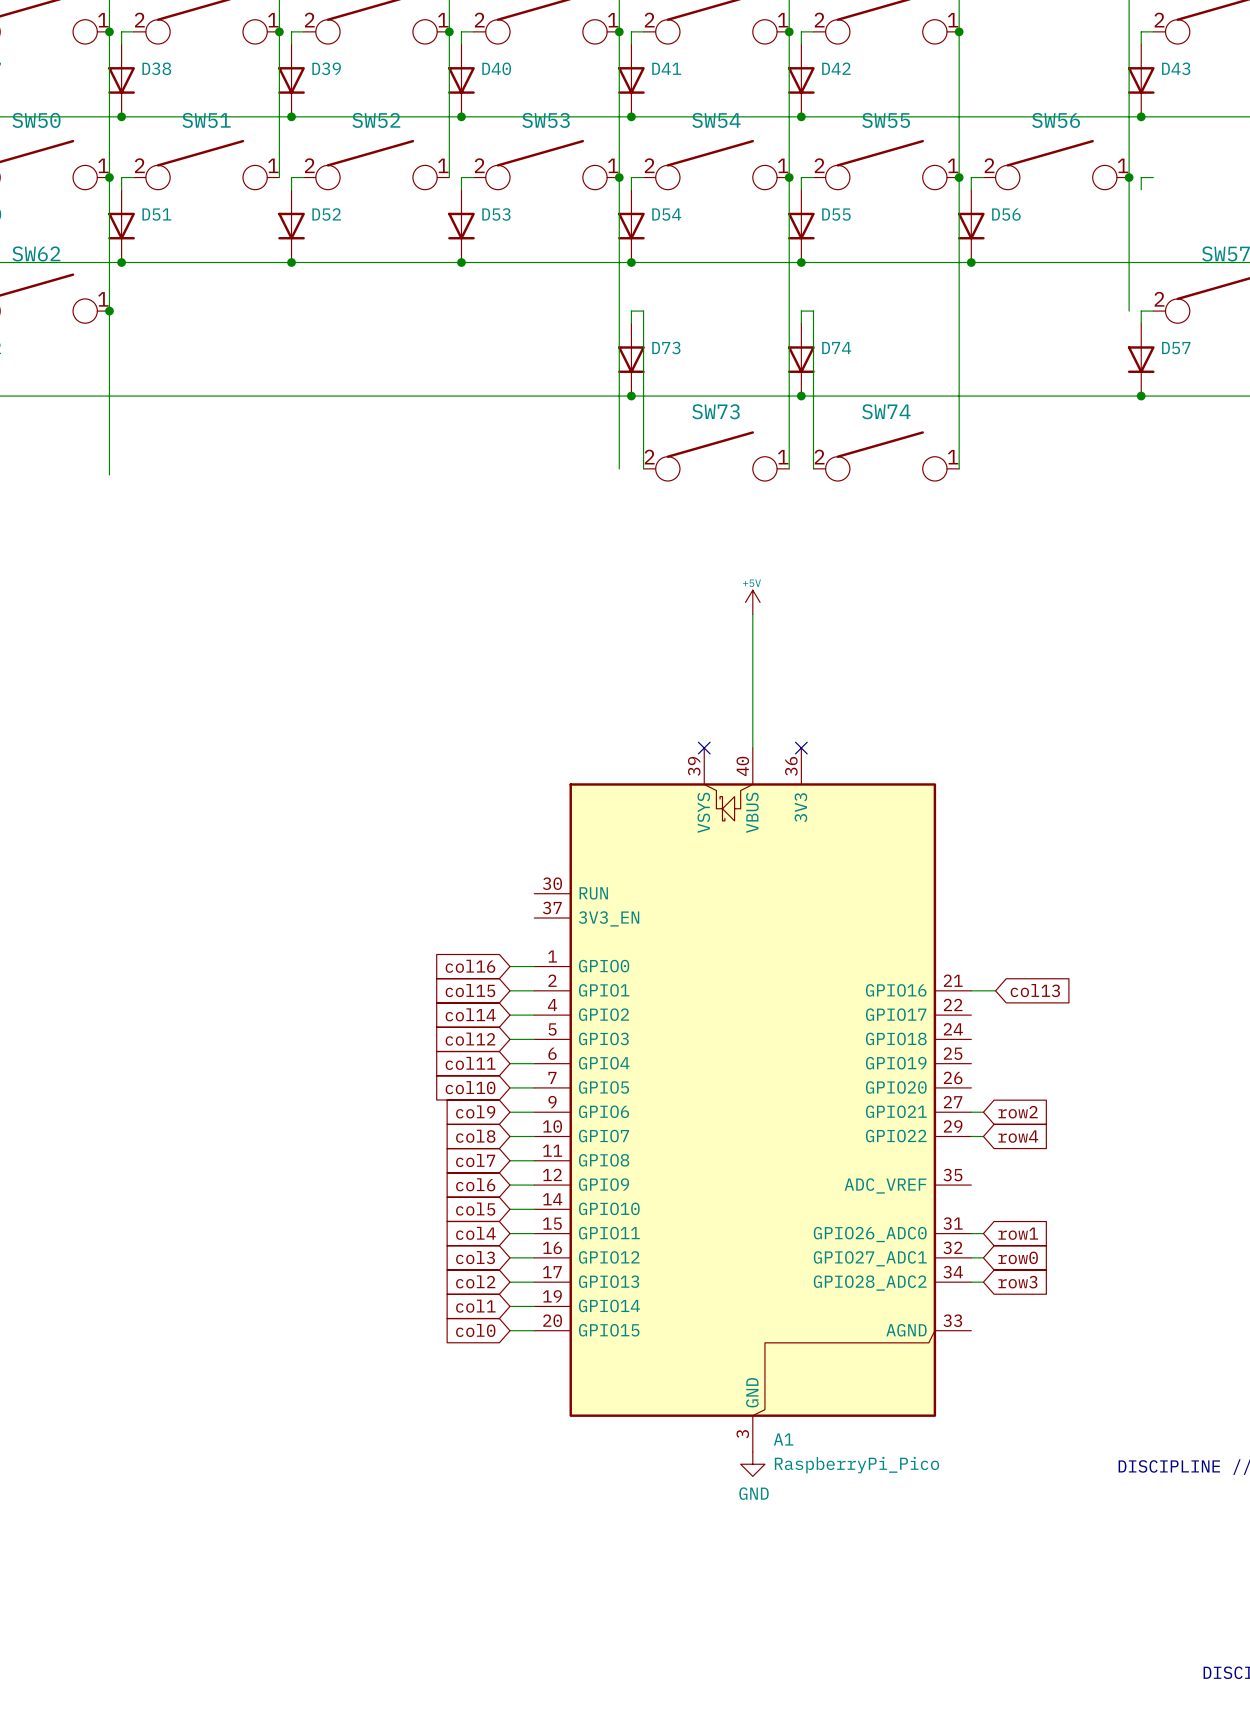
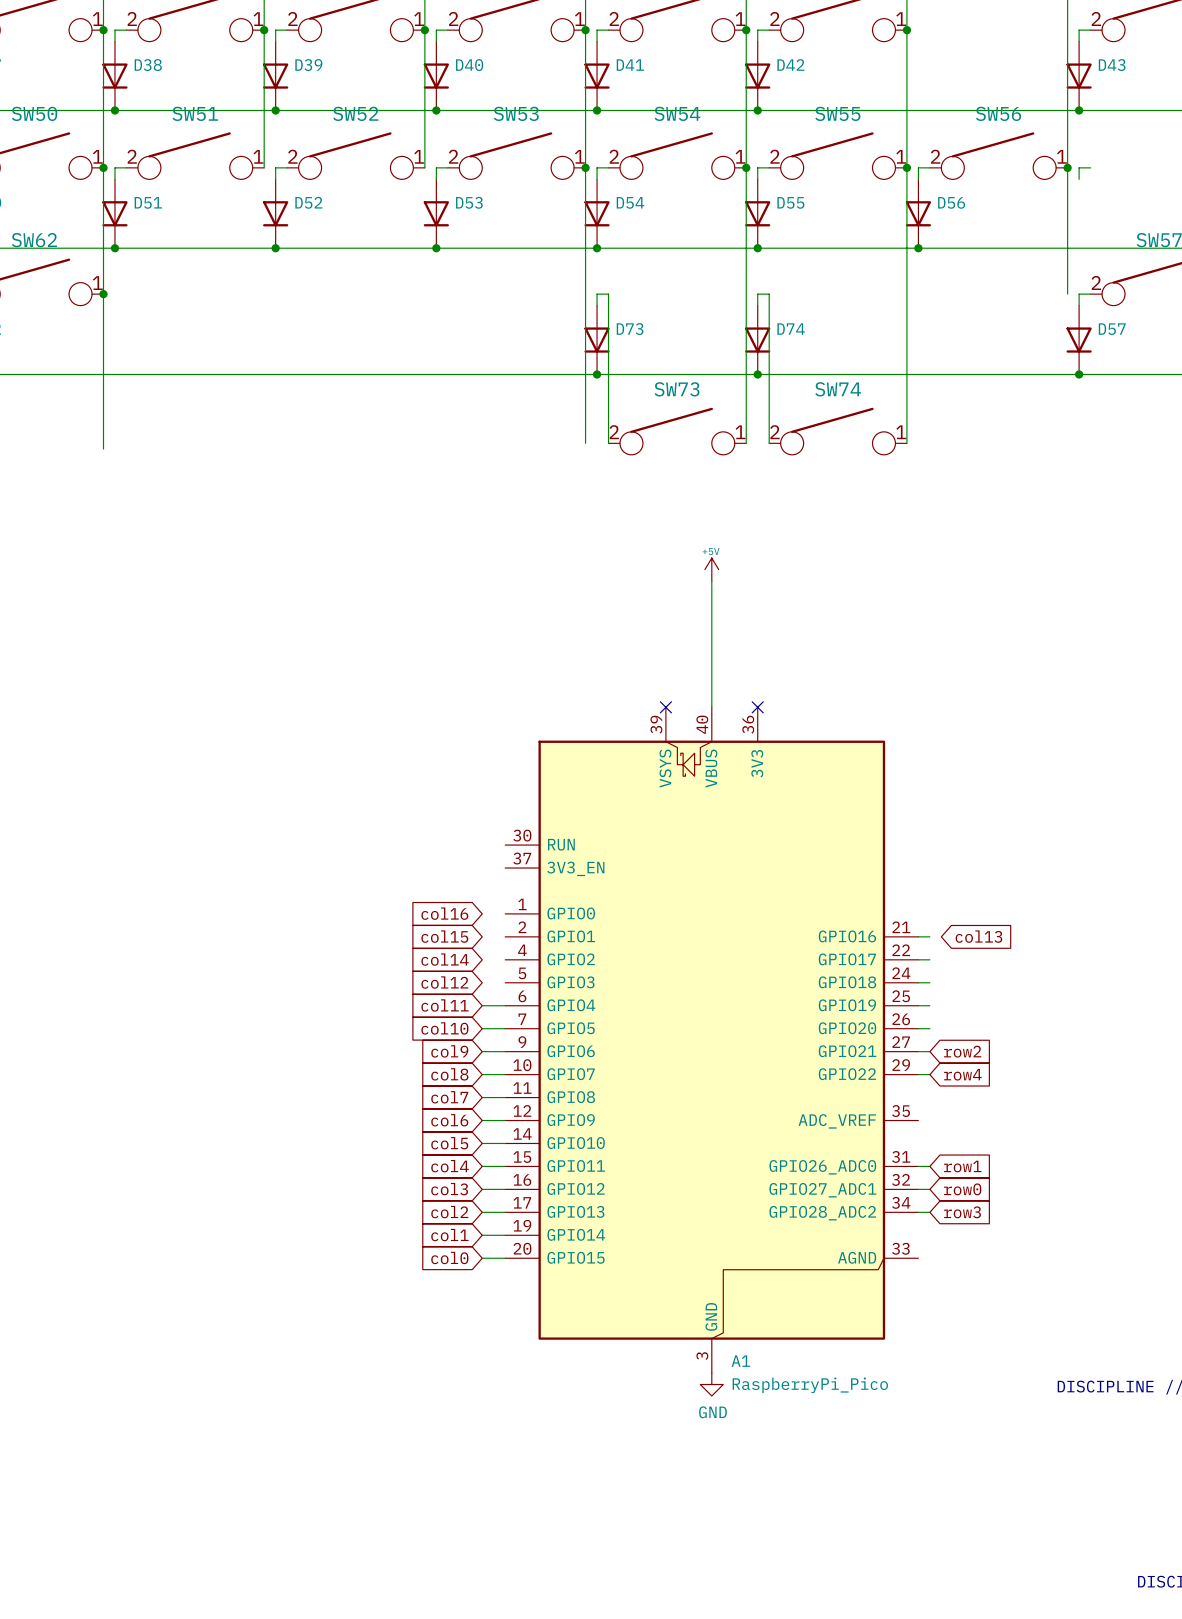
wire: (510, 966) (534, 966) -> none
wire: (510, 990) (534, 990) -> none
wire: (983, 990) (995, 990) -> (918, 959) (929, 959)
wire: (510, 1015) (534, 1015) -> none
wire: (510, 1039) (534, 1039) -> none
wire: none -> (918, 982) (929, 982)
wire: none -> (918, 1005) (929, 1005)
wire: none -> (918, 1028) (929, 1028)

